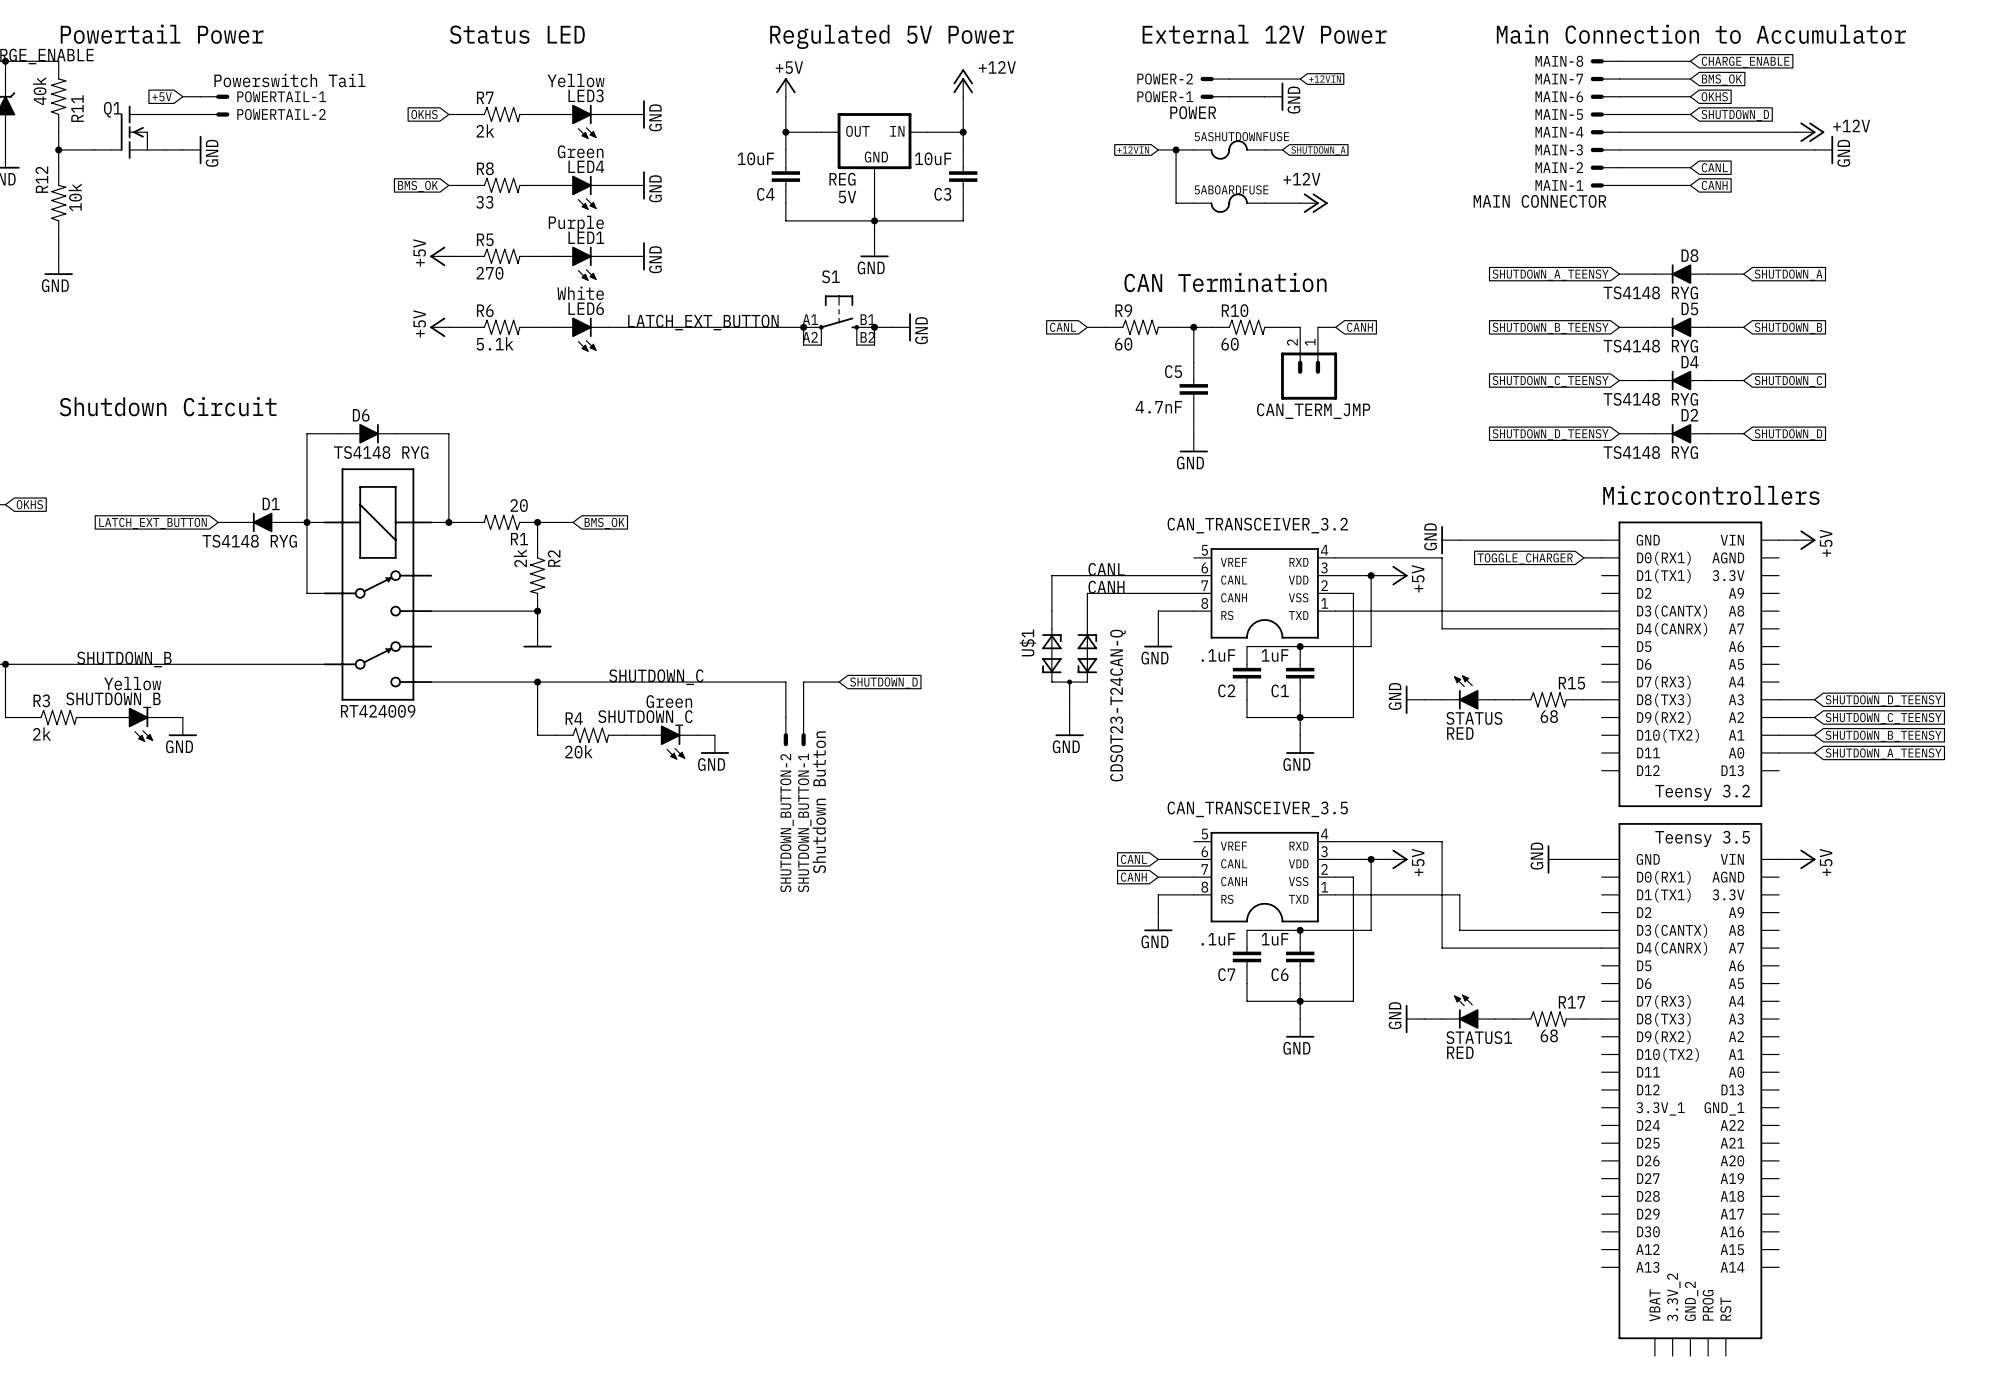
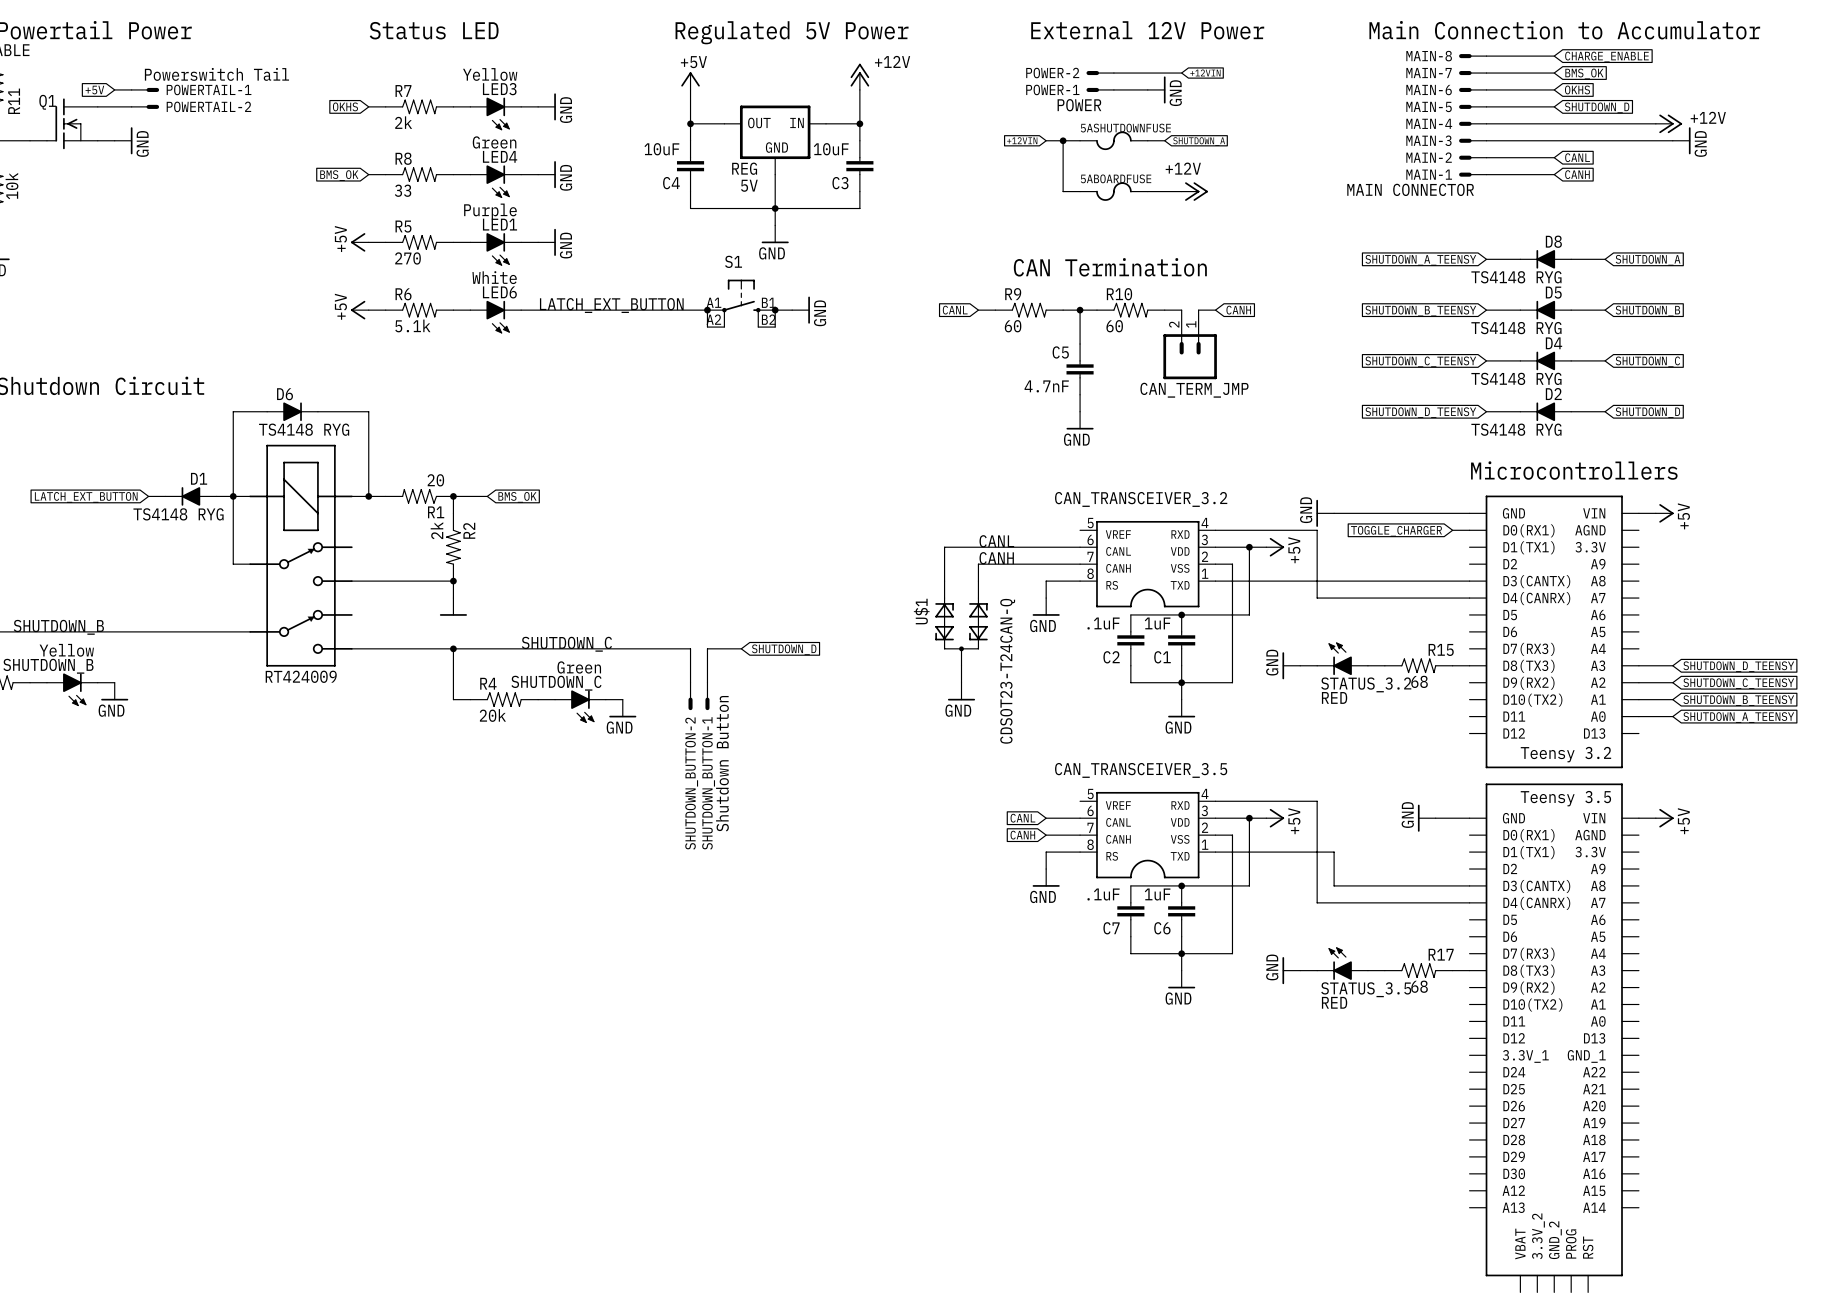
STATUS name: STATUS (1474, 718) -> STATUS_3.2 (1366, 684)
STATUS1 name: STATUS1 (1479, 1037) -> STATUS_3.5 (1366, 989)

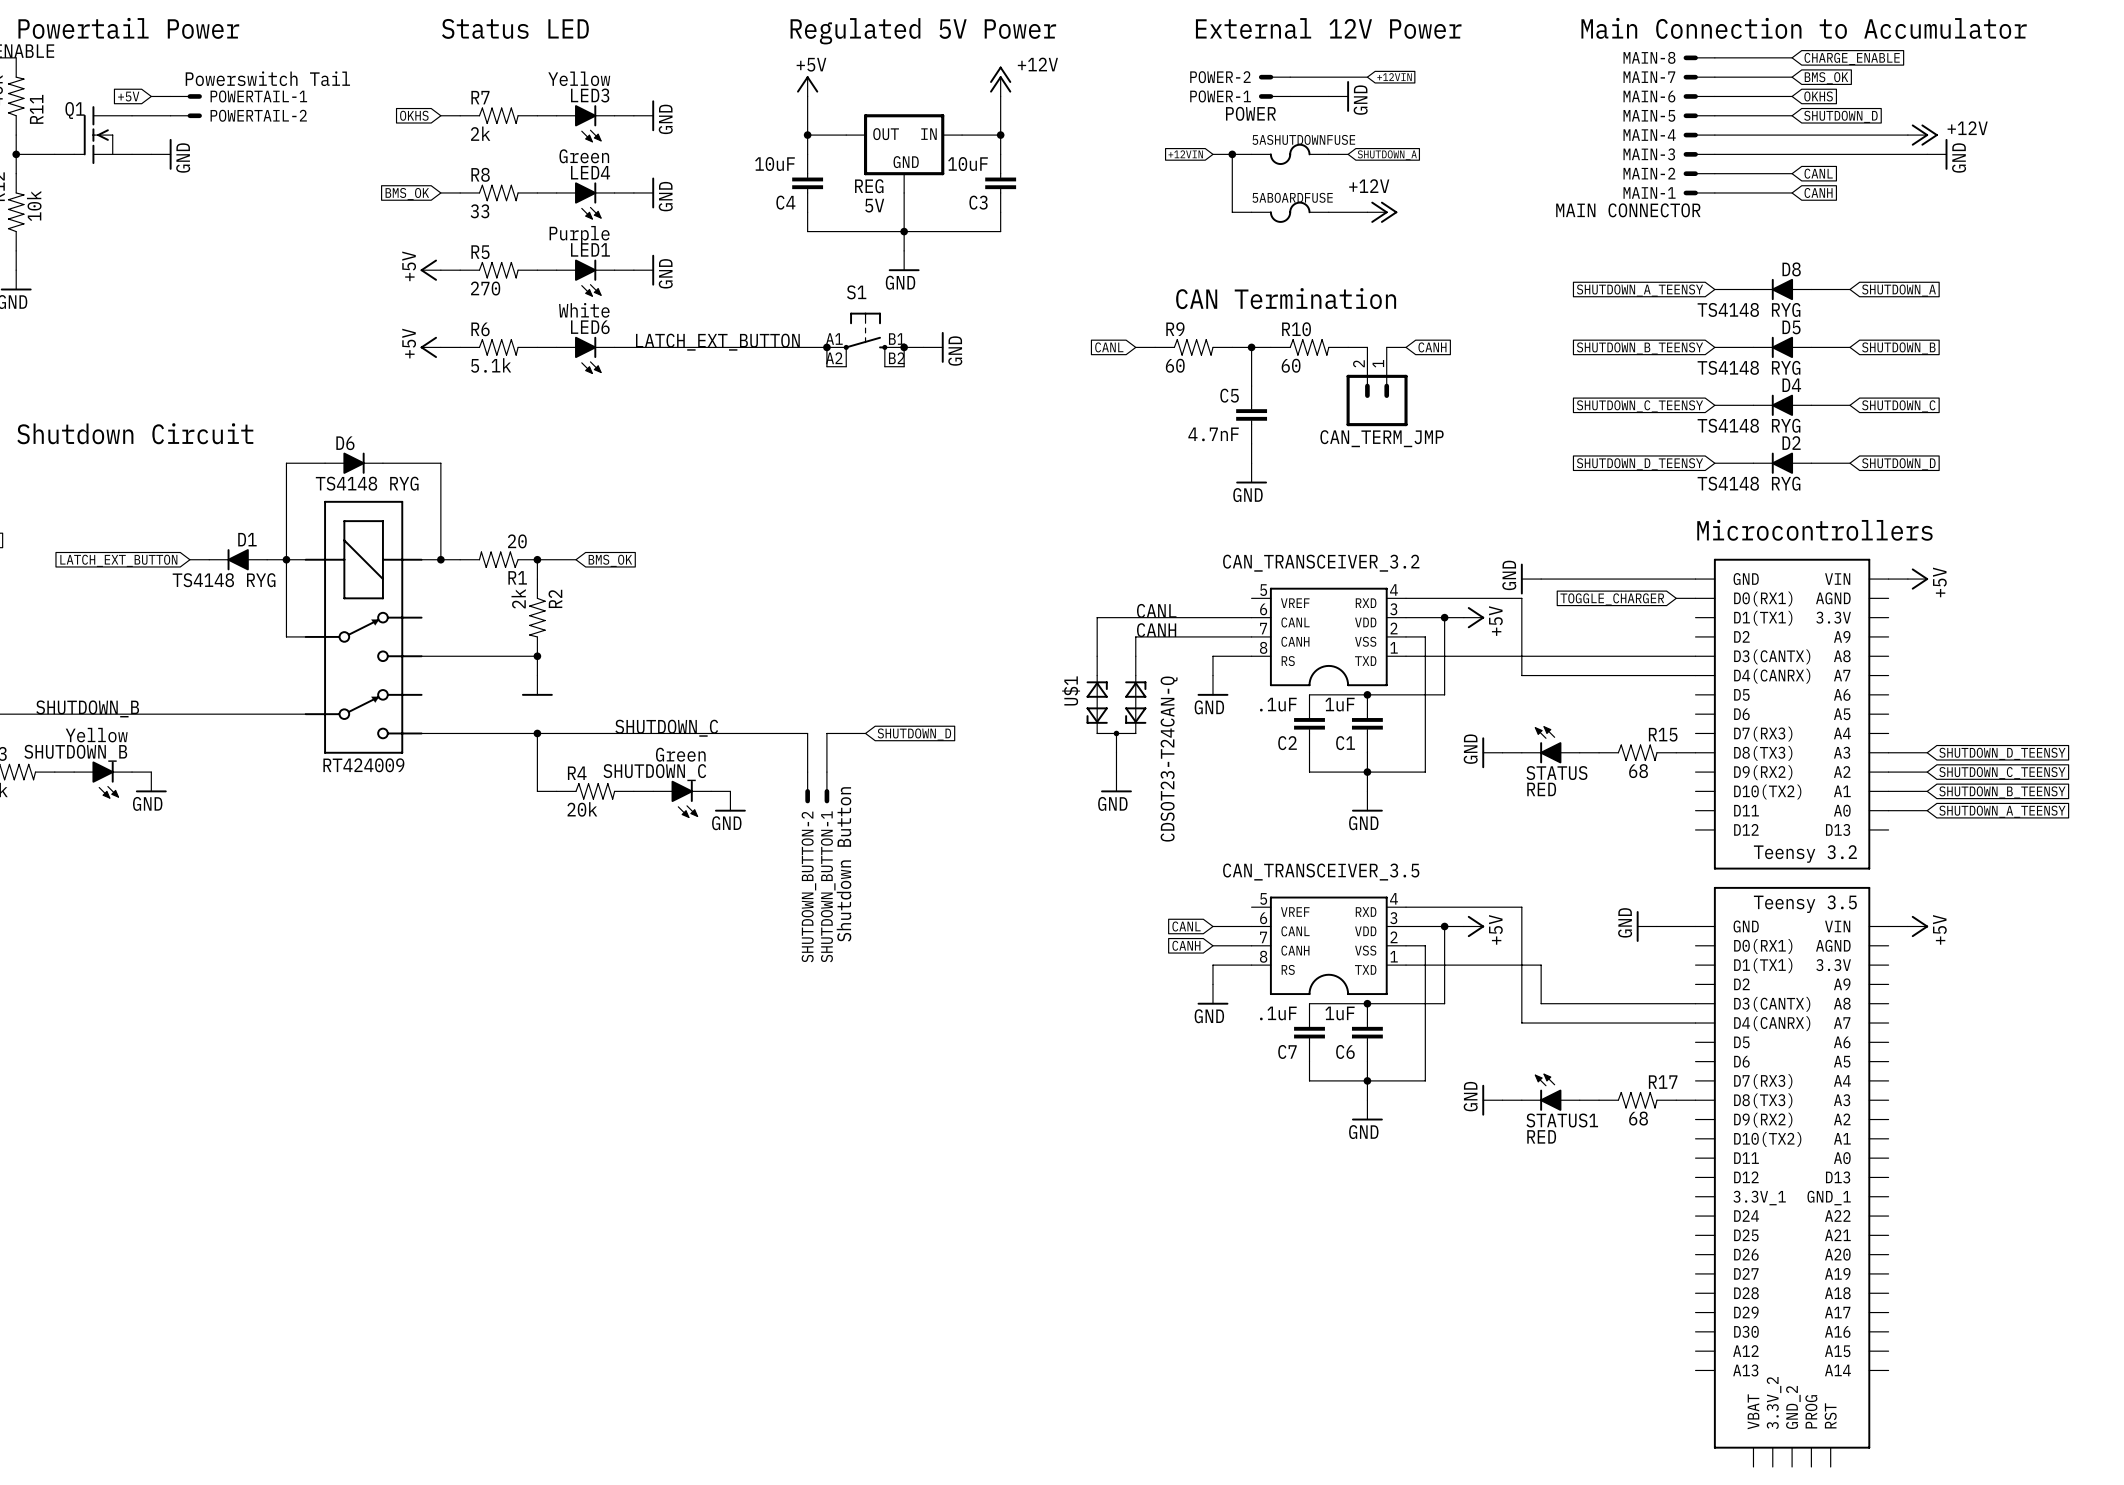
STATUS_3.2 name: STATUS_3.2 (1366, 684) -> STATUS (1556, 773)
STATUS_3.5 name: STATUS_3.5 (1366, 989) -> STATUS1 (1562, 1120)

